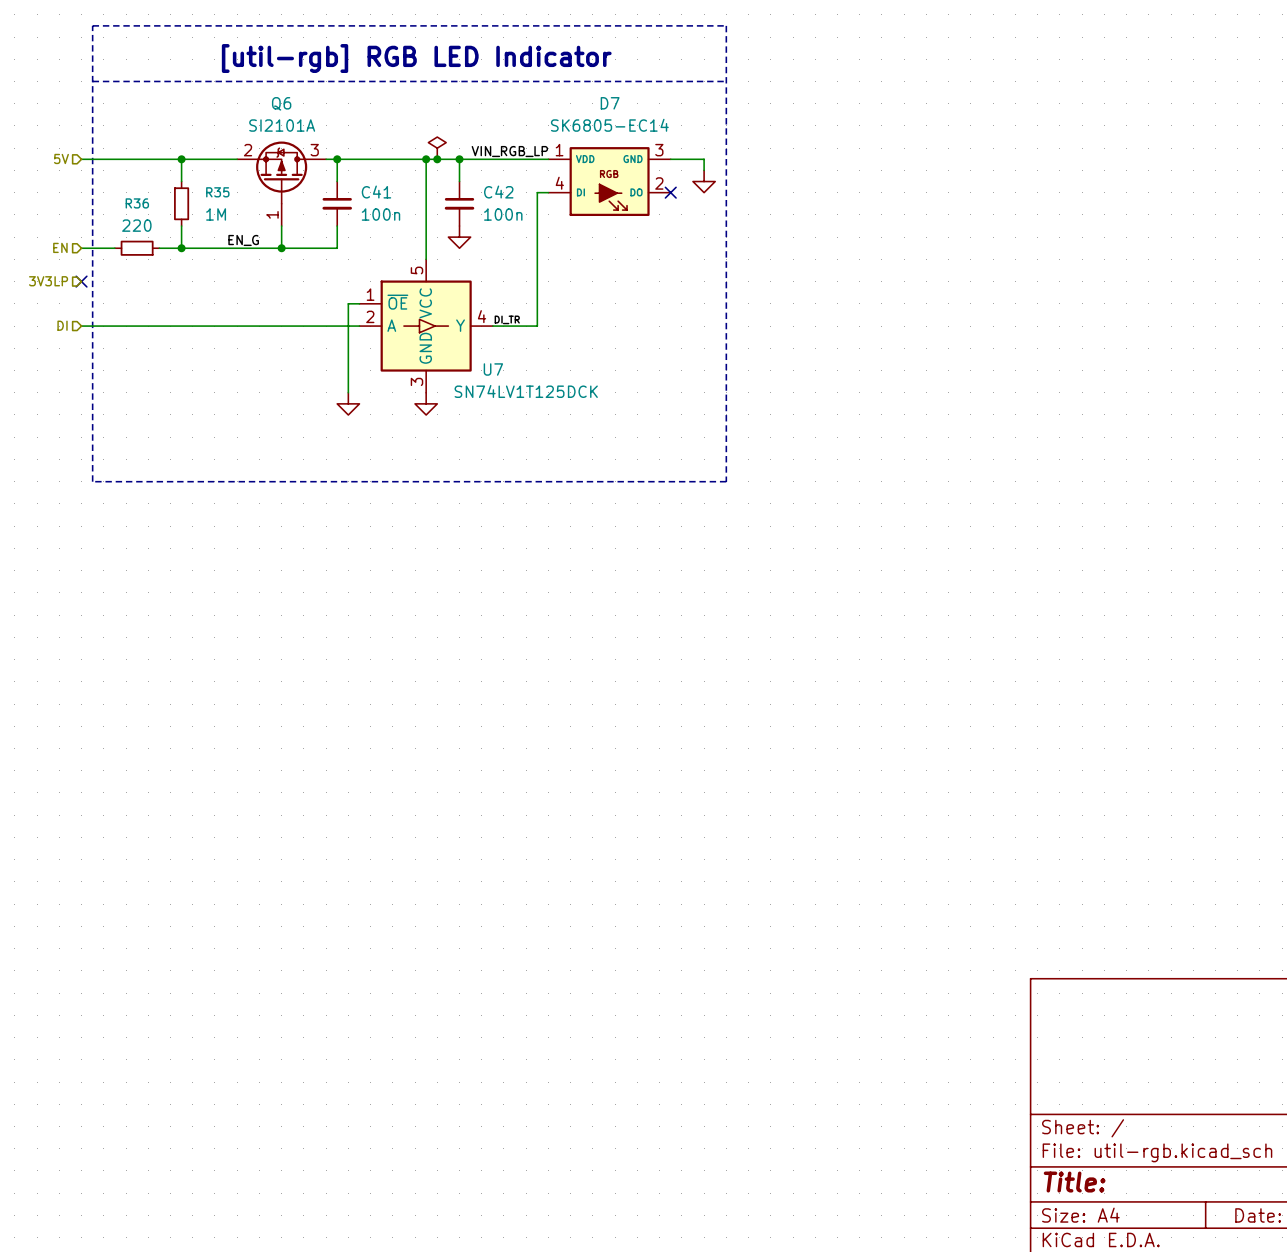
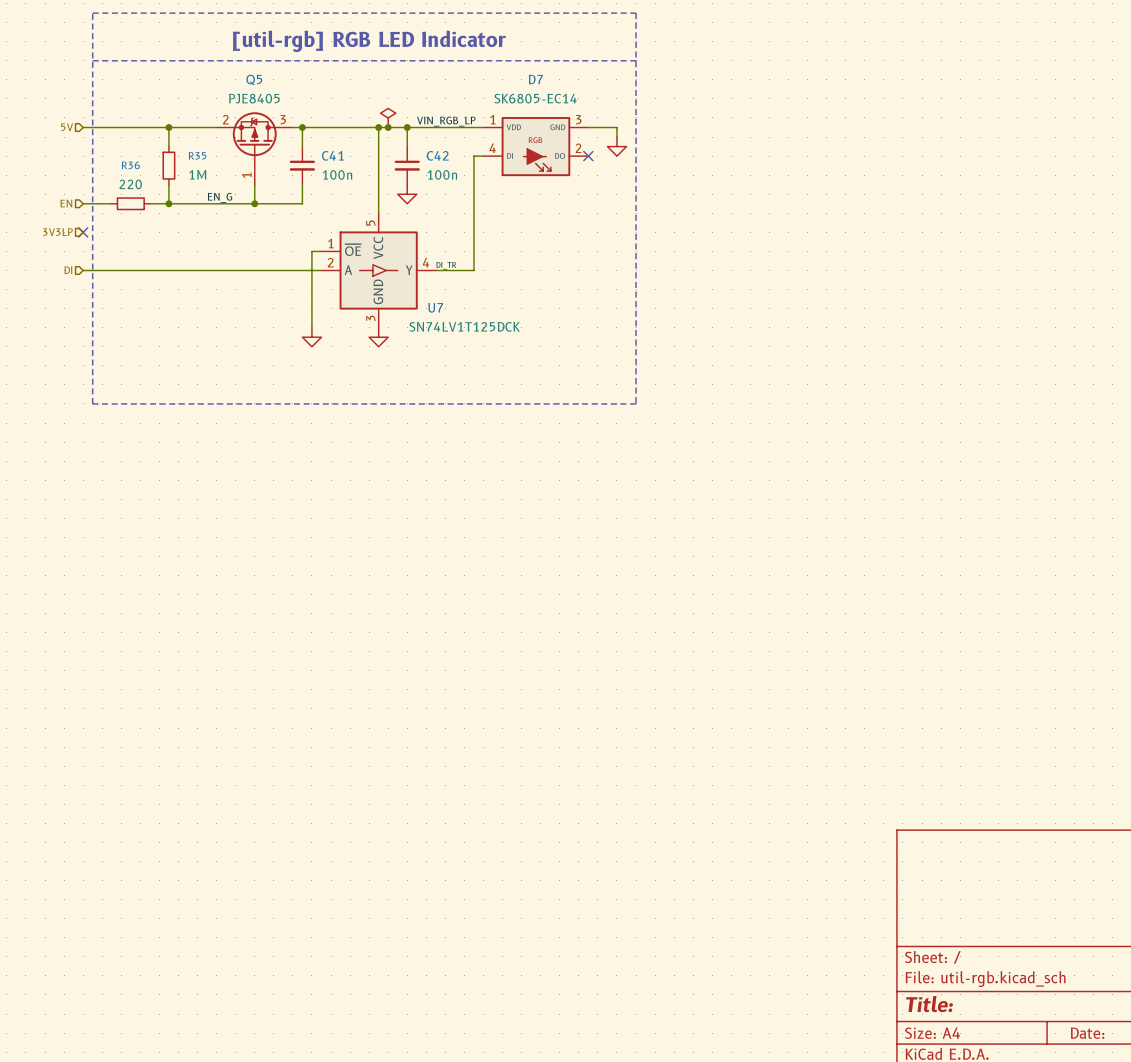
Q6: SI2101A (281, 183) -> none
Q5: none -> PJE8405 (254, 148)

